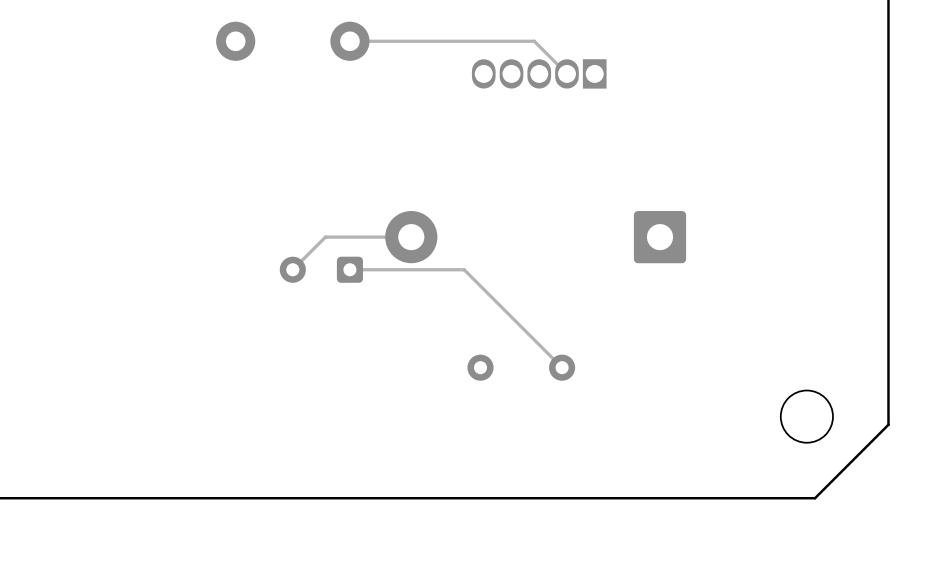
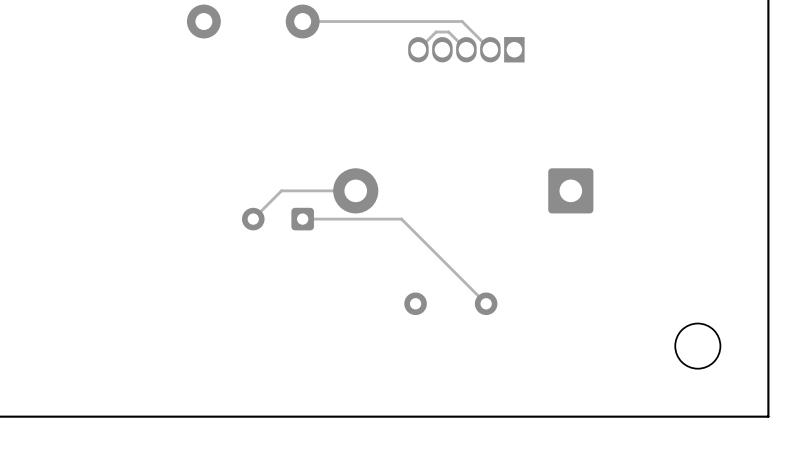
track: none -> (466, 49) (448, 32) (436, 32) (418, 49)
board edge: (888, 424) (815, 498) -> (768, 353) (768, 416) (704, 416)

